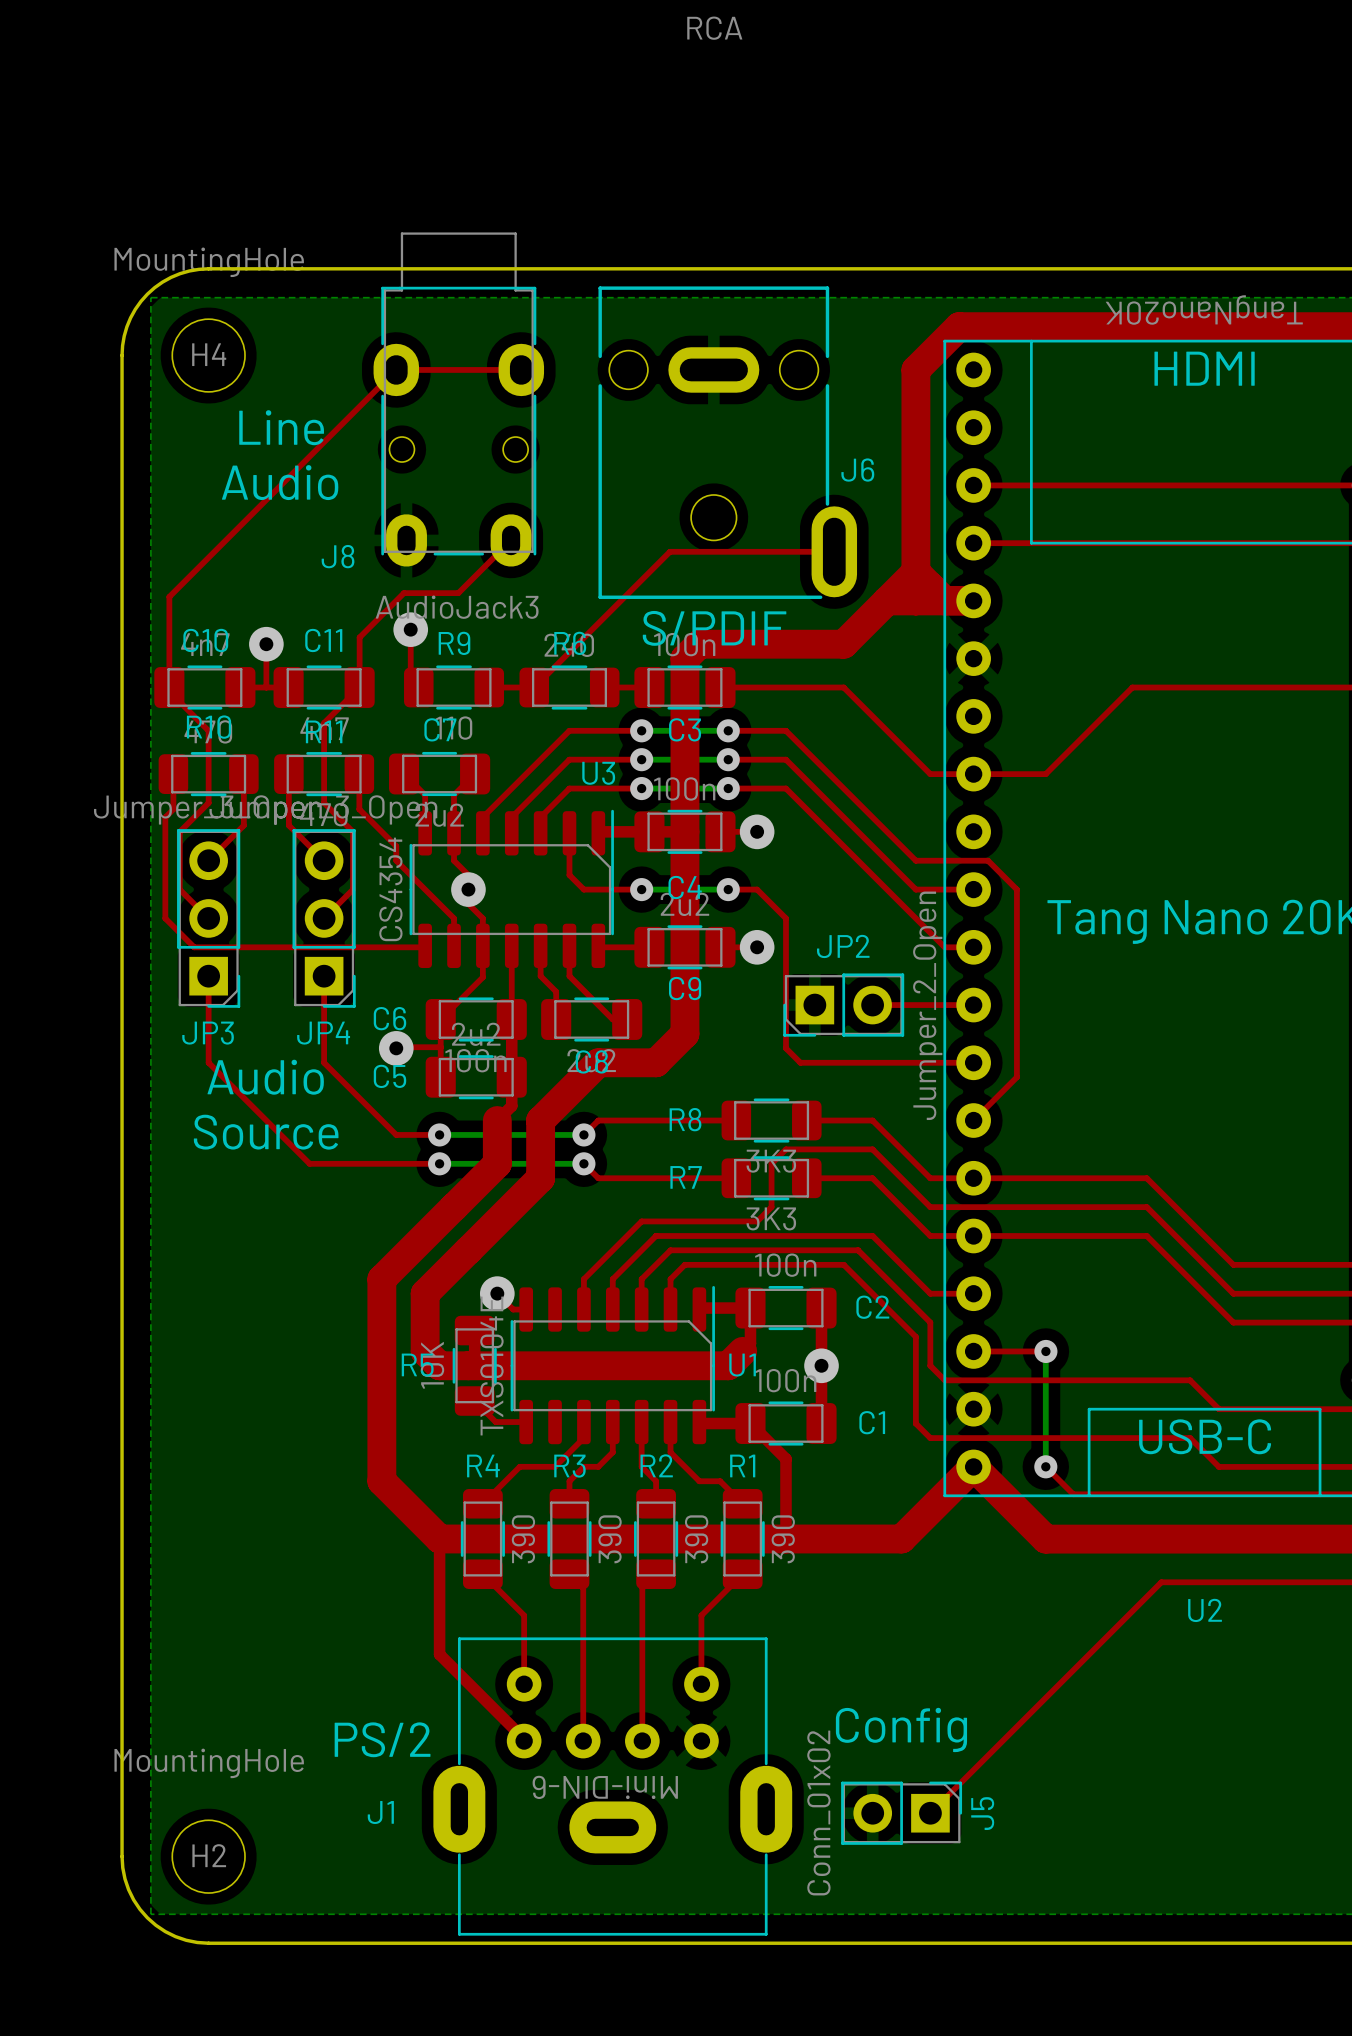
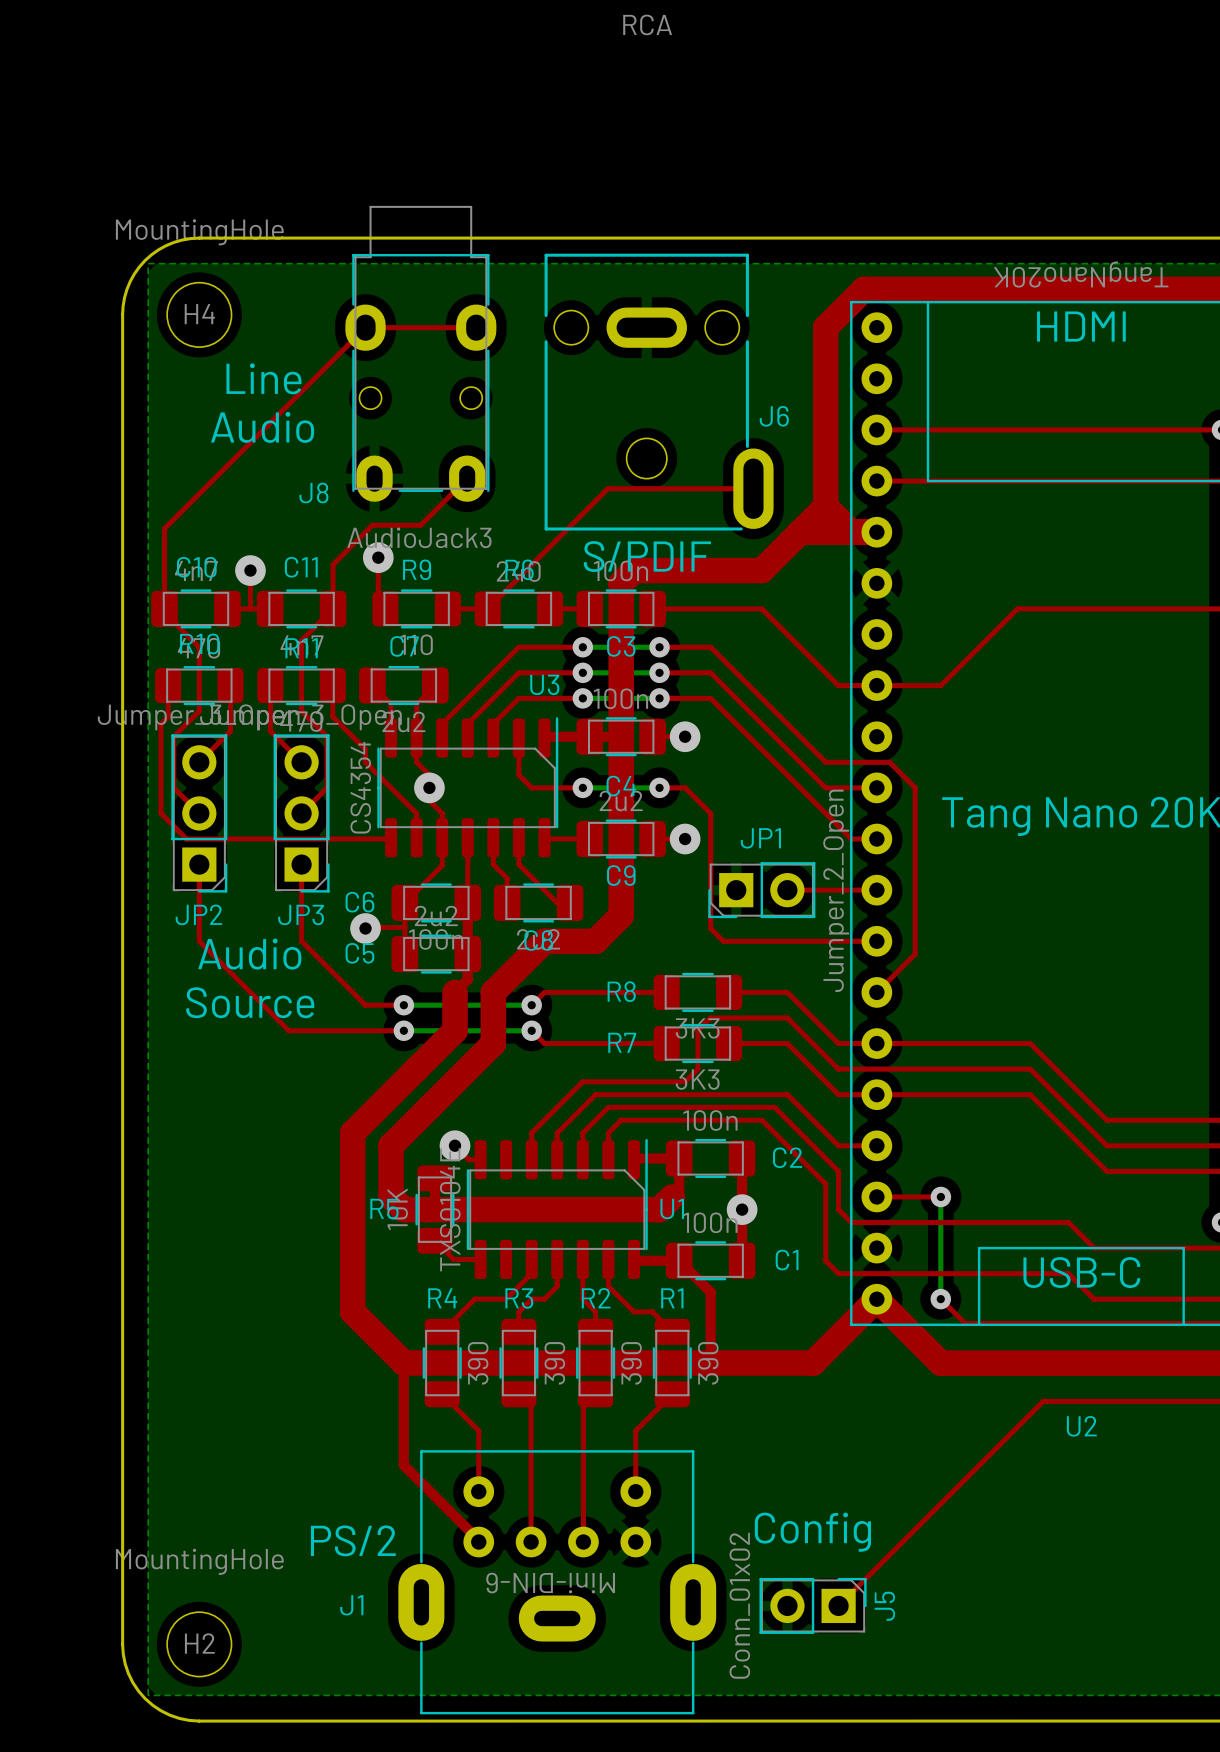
JP2 name: JP2 (843, 946) -> JP1 (760, 838)
JP3 name: JP3 (208, 1033) -> JP2 (198, 914)
JP4 name: JP4 (323, 1033) -> JP3 (301, 914)

